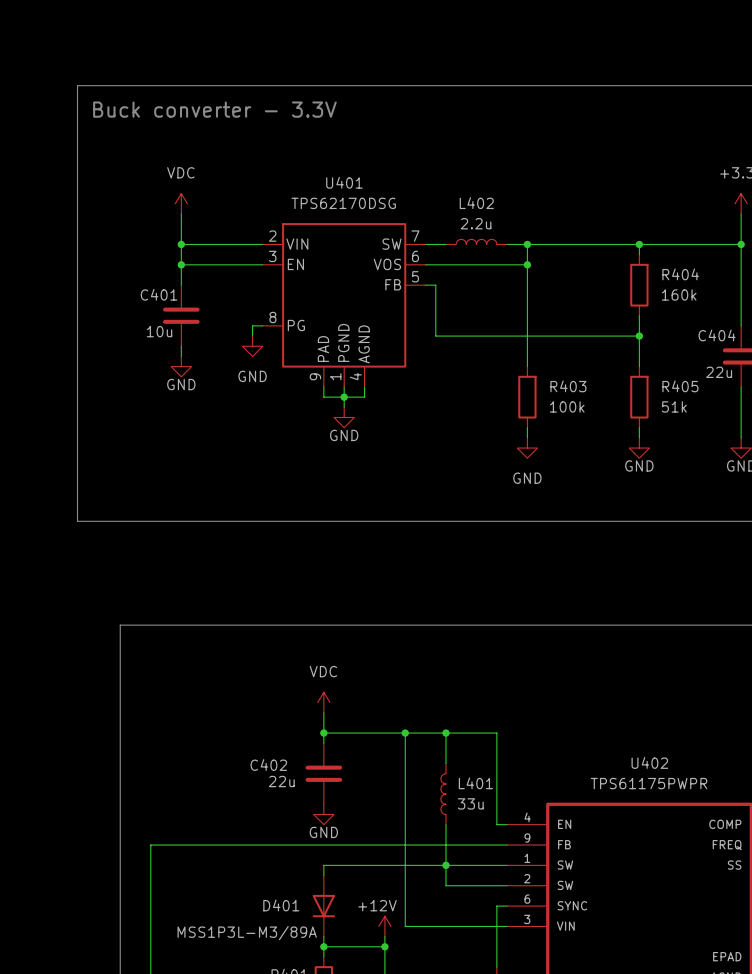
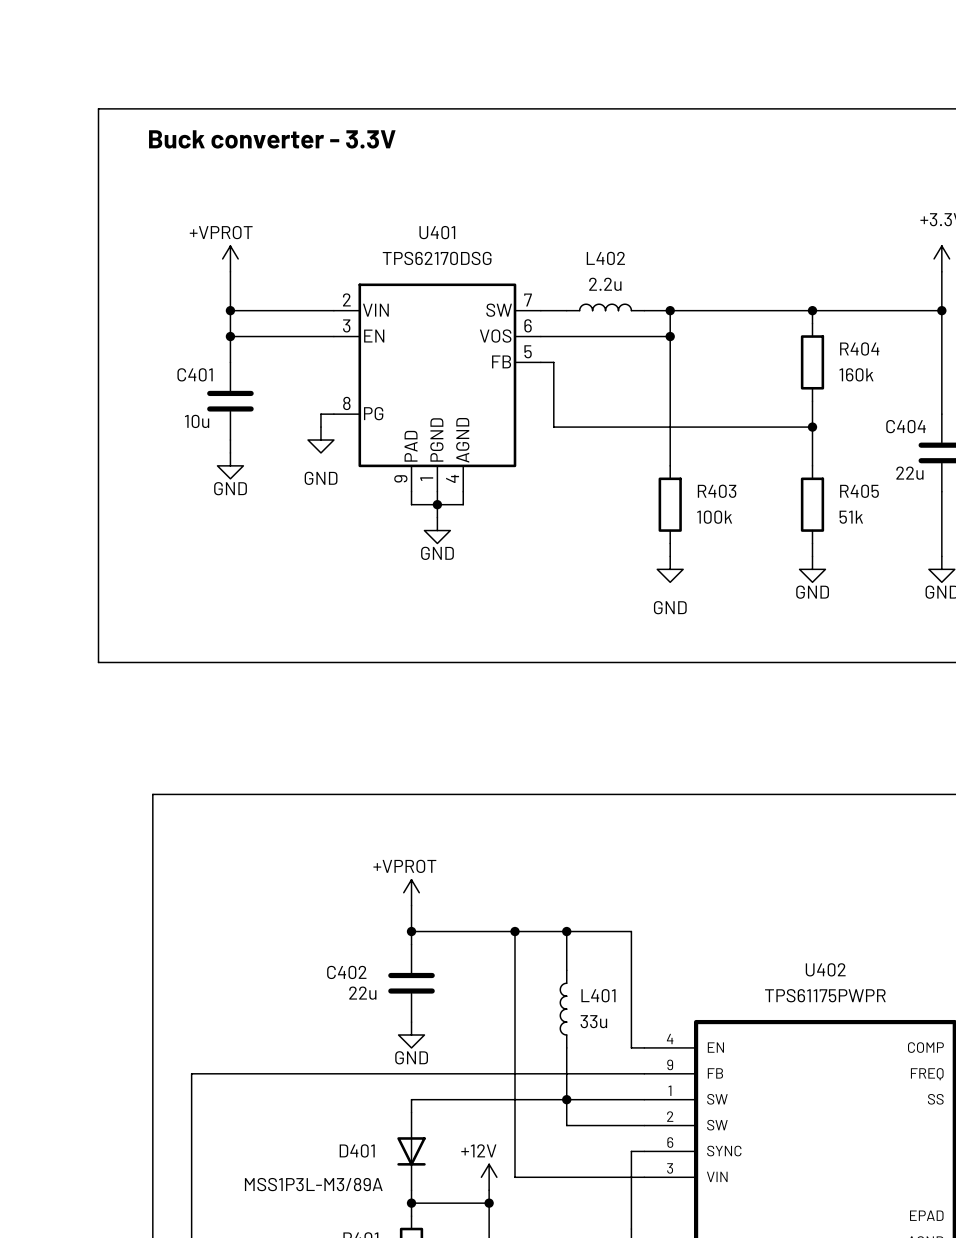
power symbol: VDC (181, 203) -> +VPROT (230, 258)
power symbol: VDC (323, 702) -> +VPROT (411, 892)

